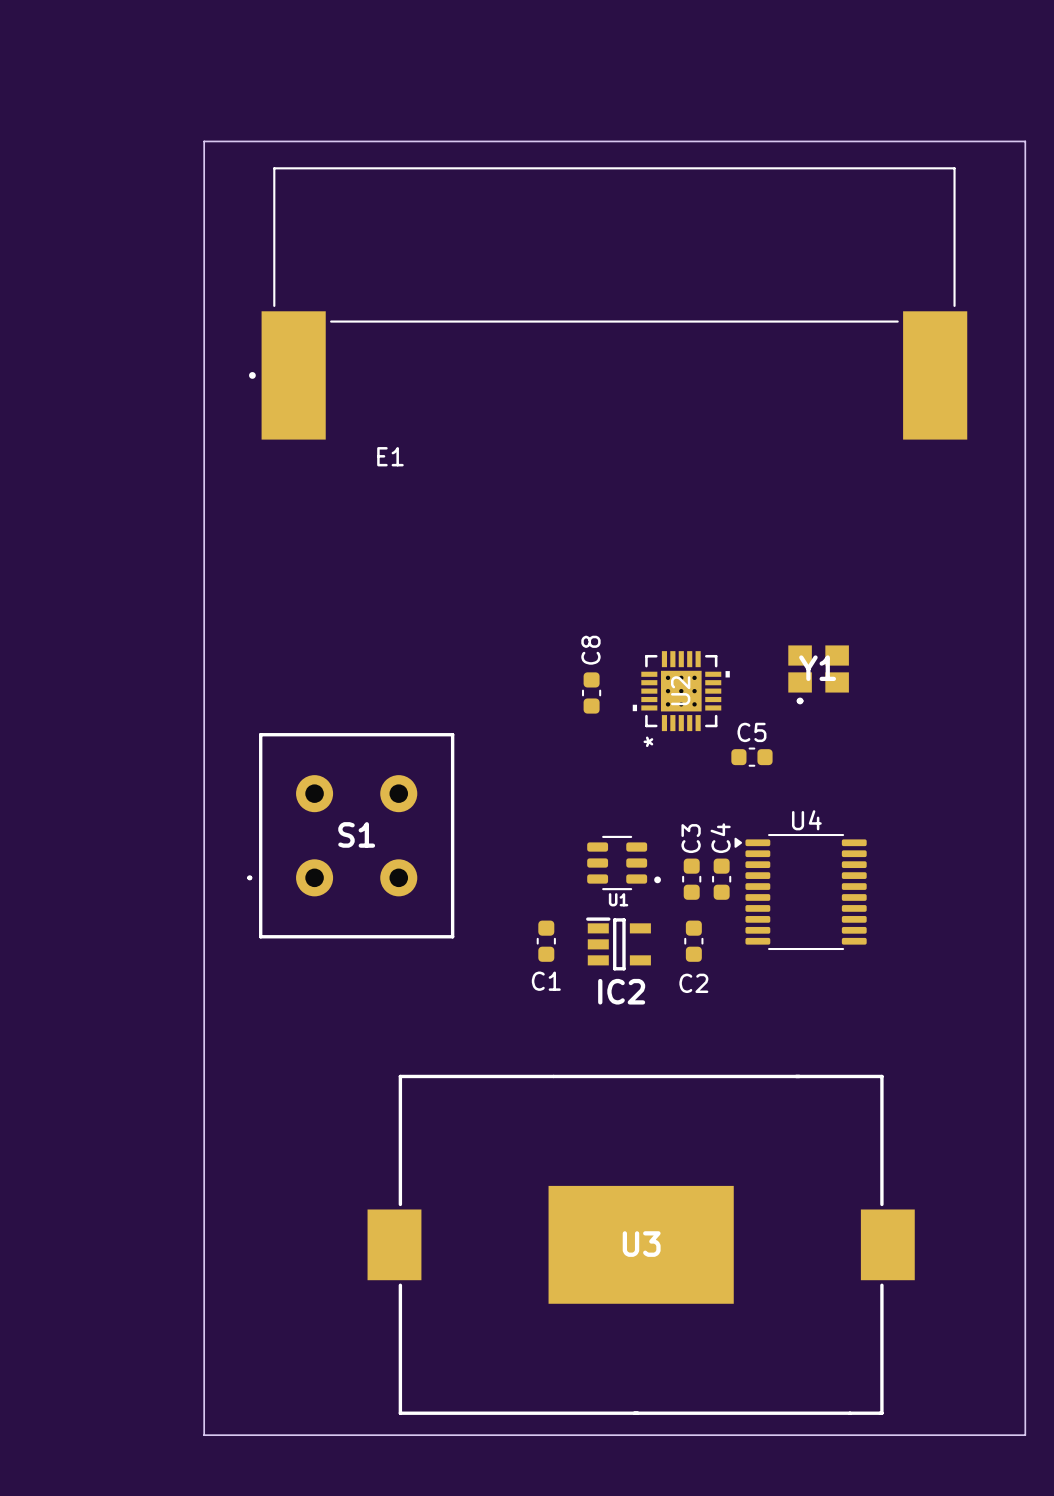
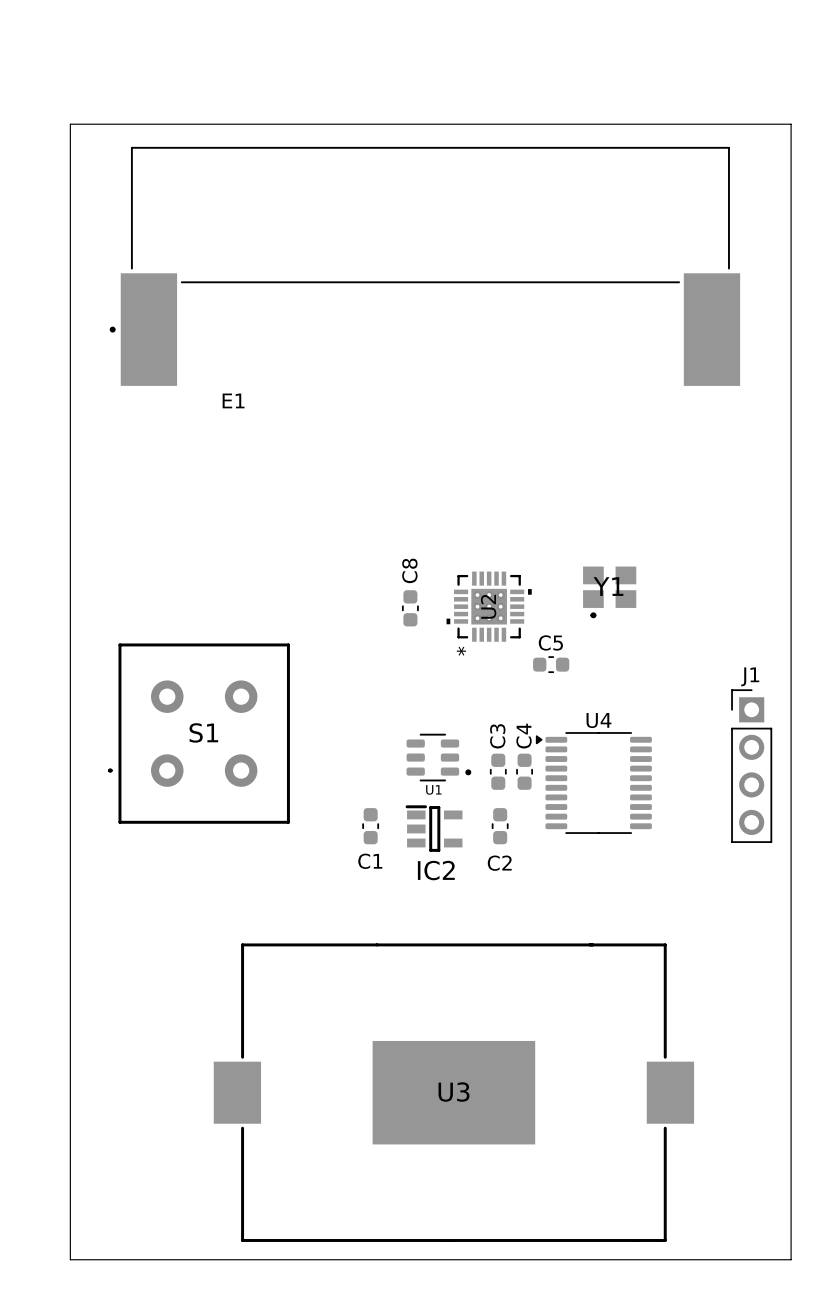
J1: none -> (751, 766)

